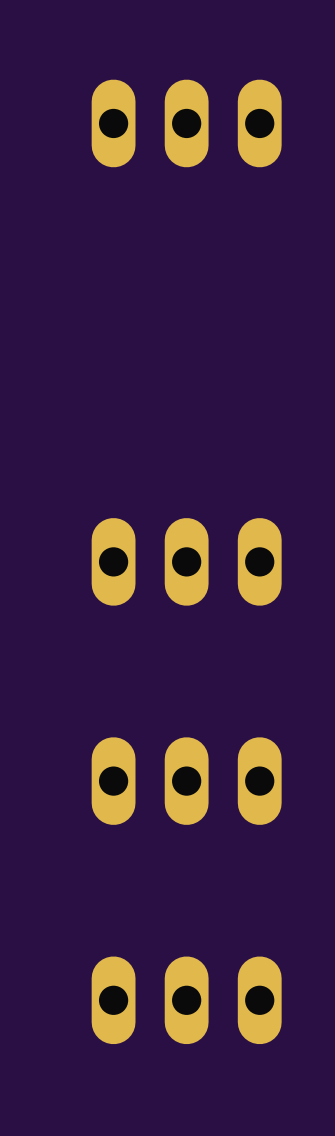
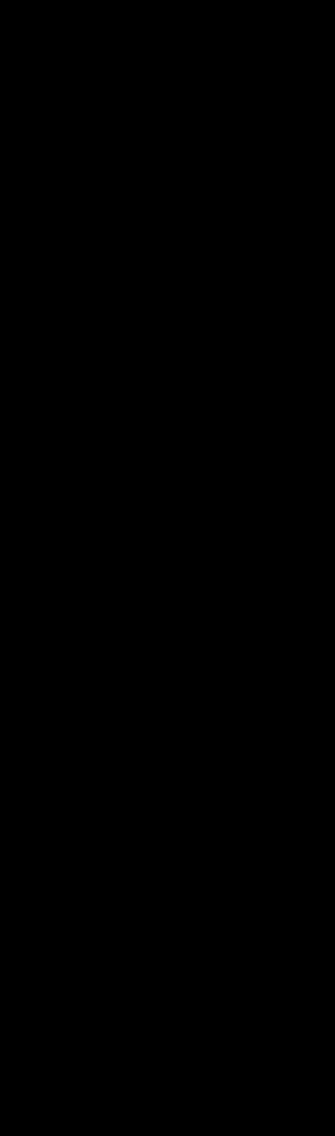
part: (186, 123) -> none
part: (186, 561) -> none
part: (186, 781) -> none
part: (186, 1000) -> none

